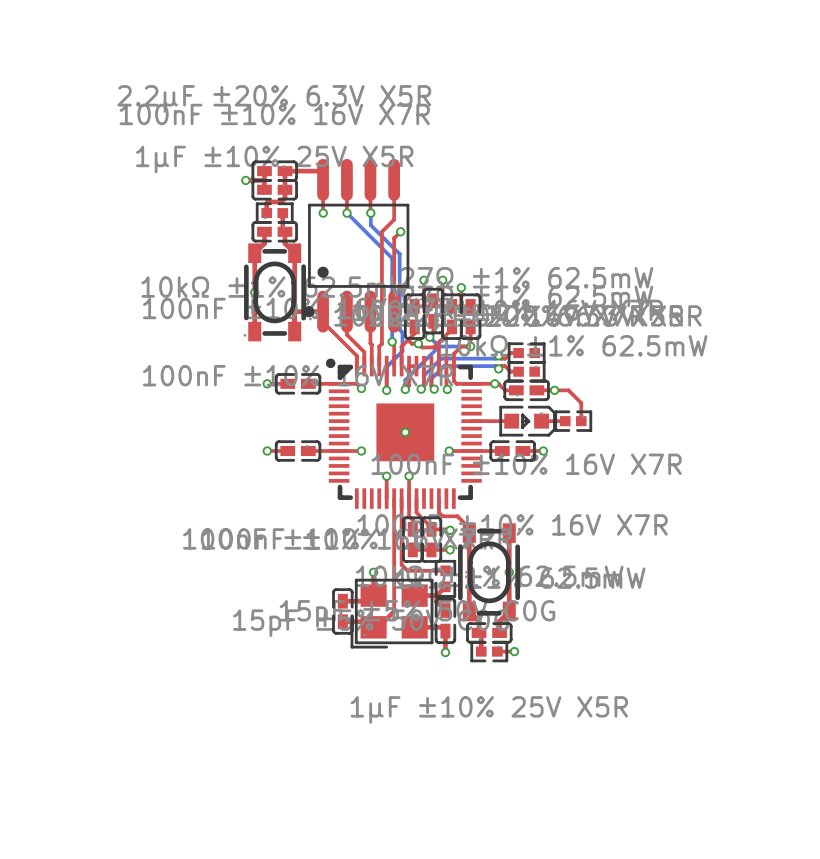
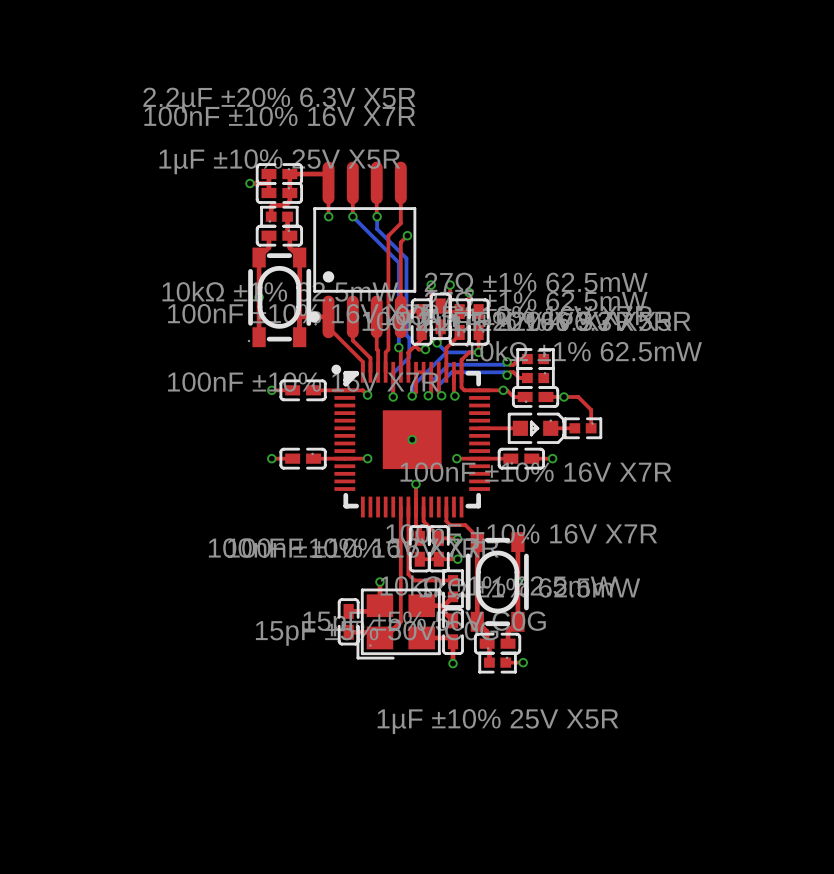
top track: (439, 342) (434, 347) (422, 347) (418, 343) -> none
top track: (386, 476) (386, 498) -> none
via: (386, 476) -> none

